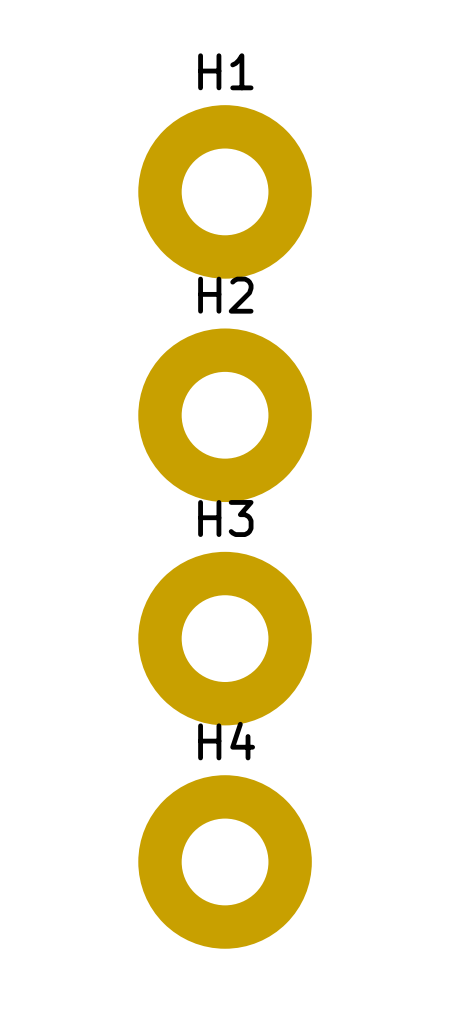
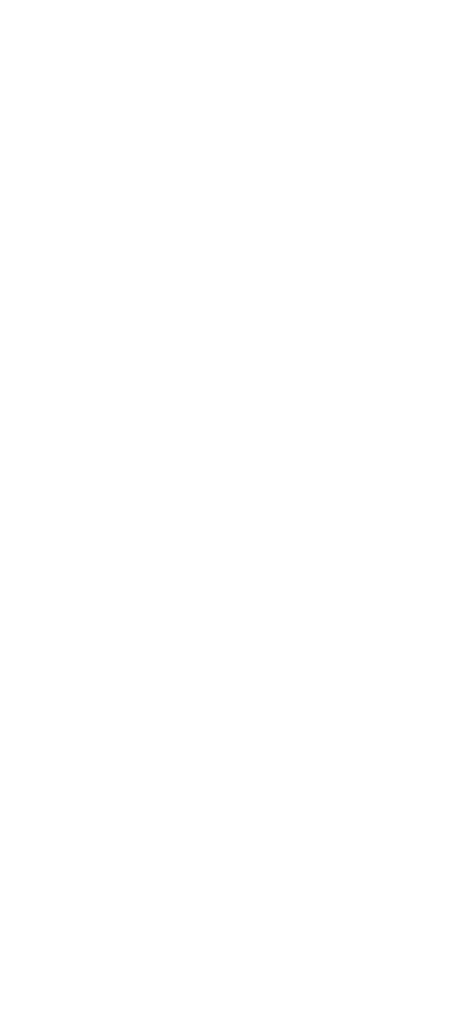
H1: (225, 191) -> none
H2: (225, 415) -> none
H3: (225, 638) -> none
H4: (225, 861) -> none

